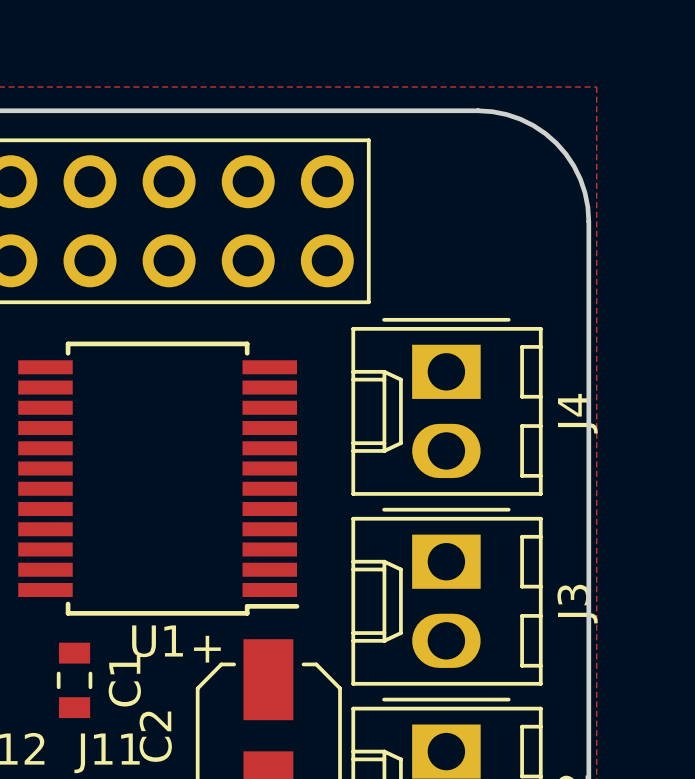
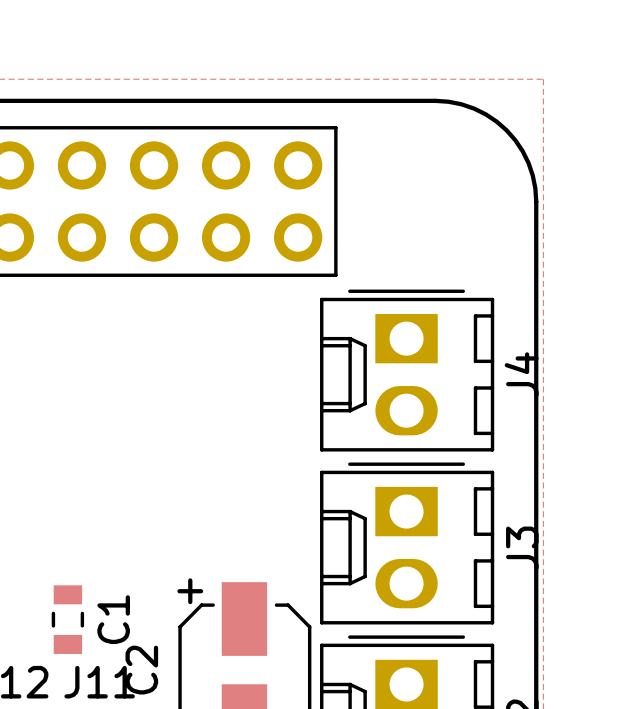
U1: (158, 478) -> none

